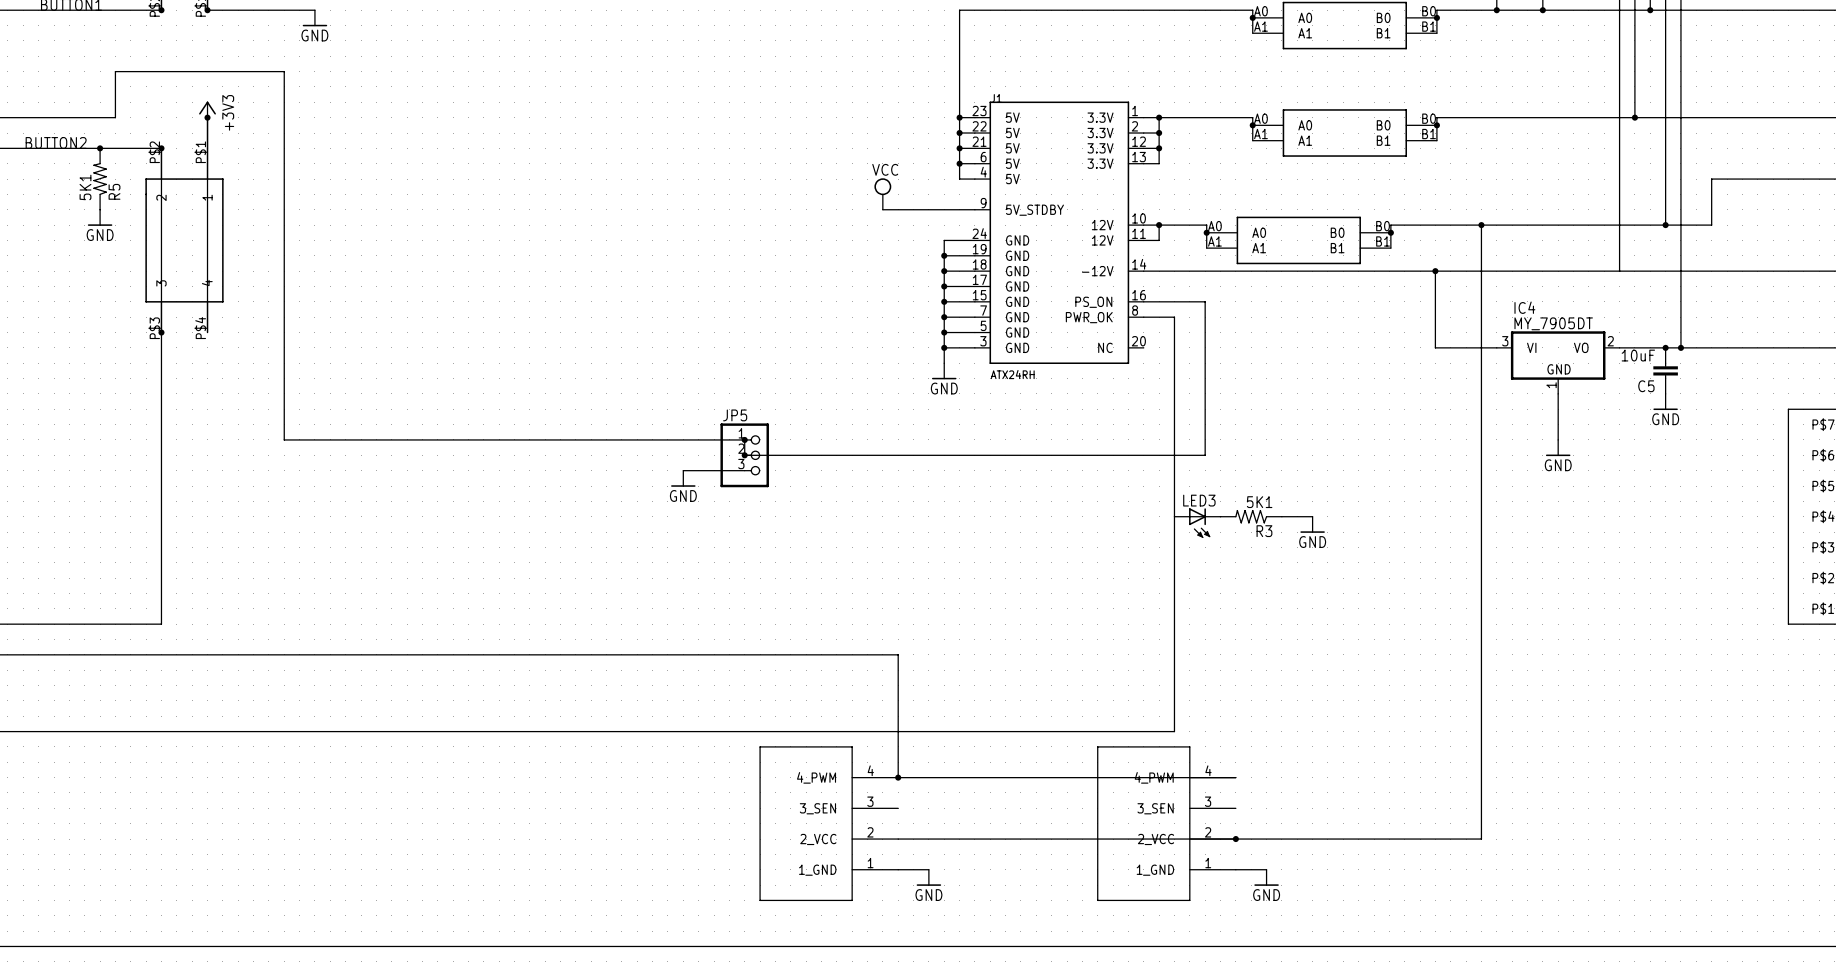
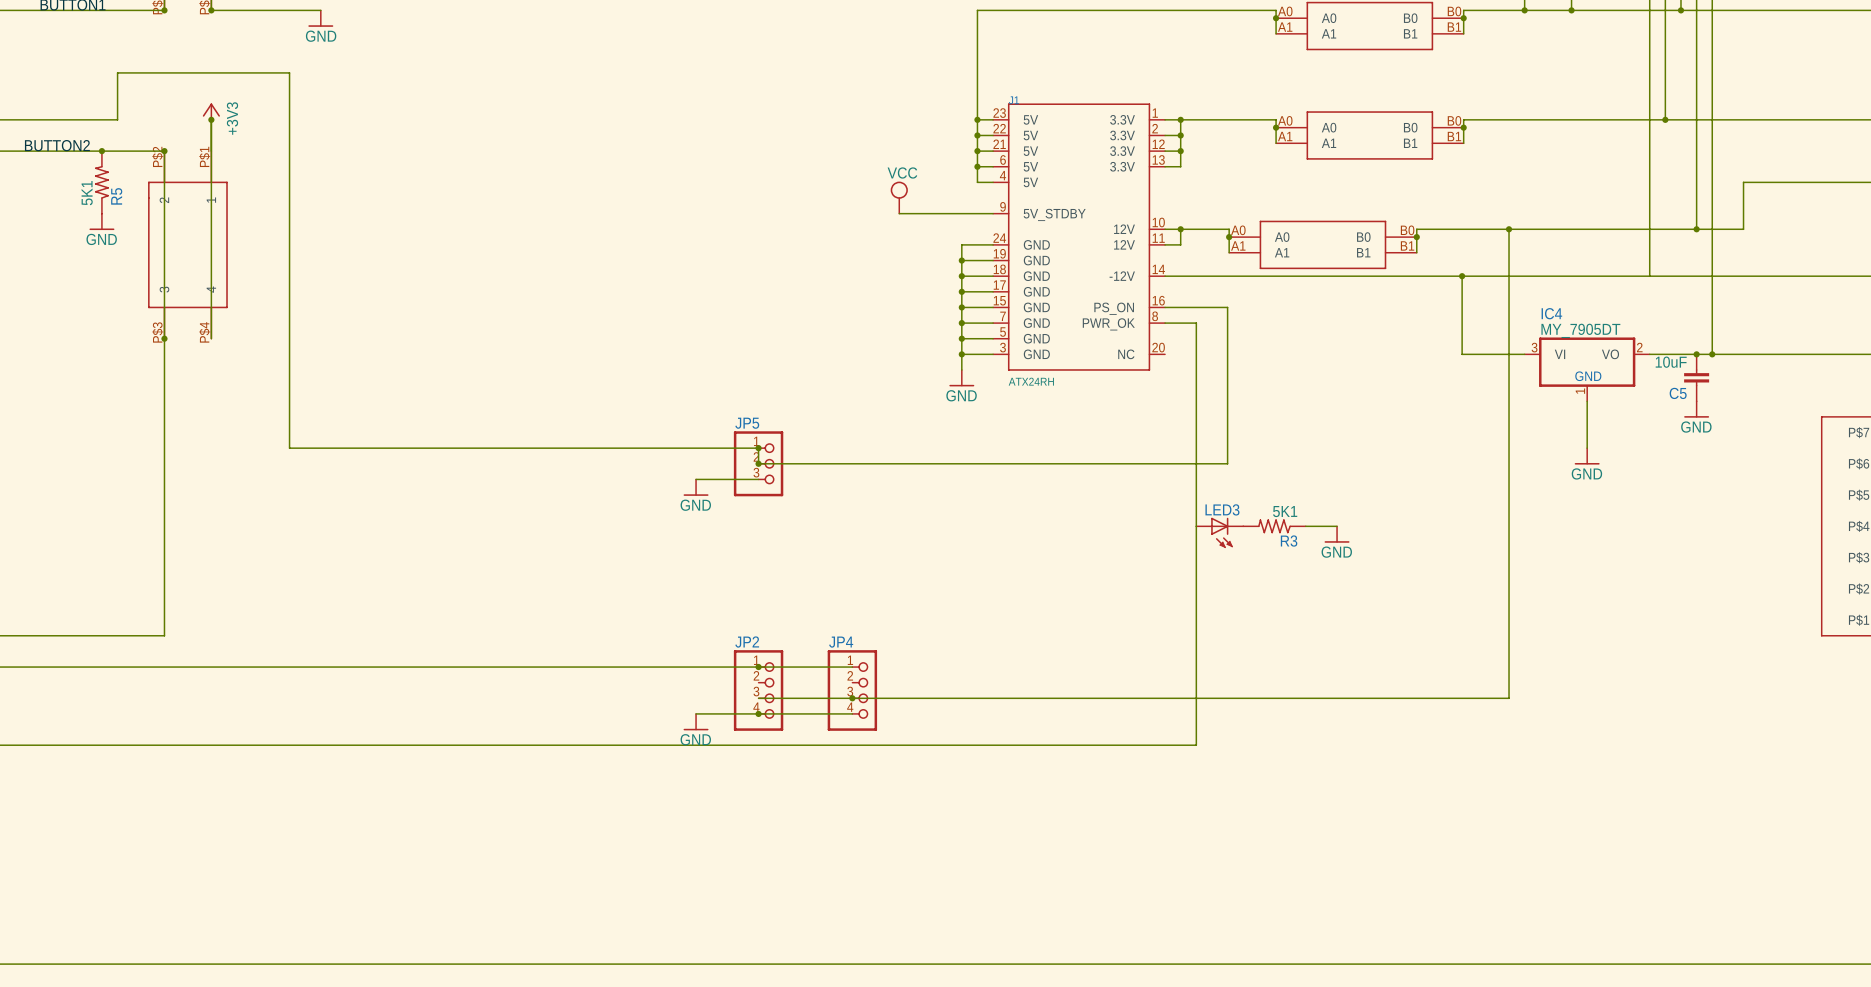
junction: none -> (758, 667)
wire: (836, 654) (898, 654) (898, 777) (1235, 777) -> none
JP2: none -> (758, 690)
JP4: none -> (852, 690)
junction: none -> (852, 698)
wire: (1481, 685) (1481, 839) (898, 839) -> (1509, 698) (758, 698)
wire: none -> (696, 713) (852, 713)
junction: none -> (758, 713)
power symbol: none -> GND (696, 722)
junction: (898, 777) -> none
part: (828, 823) -> none
part: (1166, 823) -> none
junction: (1235, 839) -> none
wire: (898, 869) (928, 869) -> none
wire: (1235, 869) (1266, 869) -> none
power symbol: GND (928, 877) -> none
power symbol: GND (1266, 877) -> none

